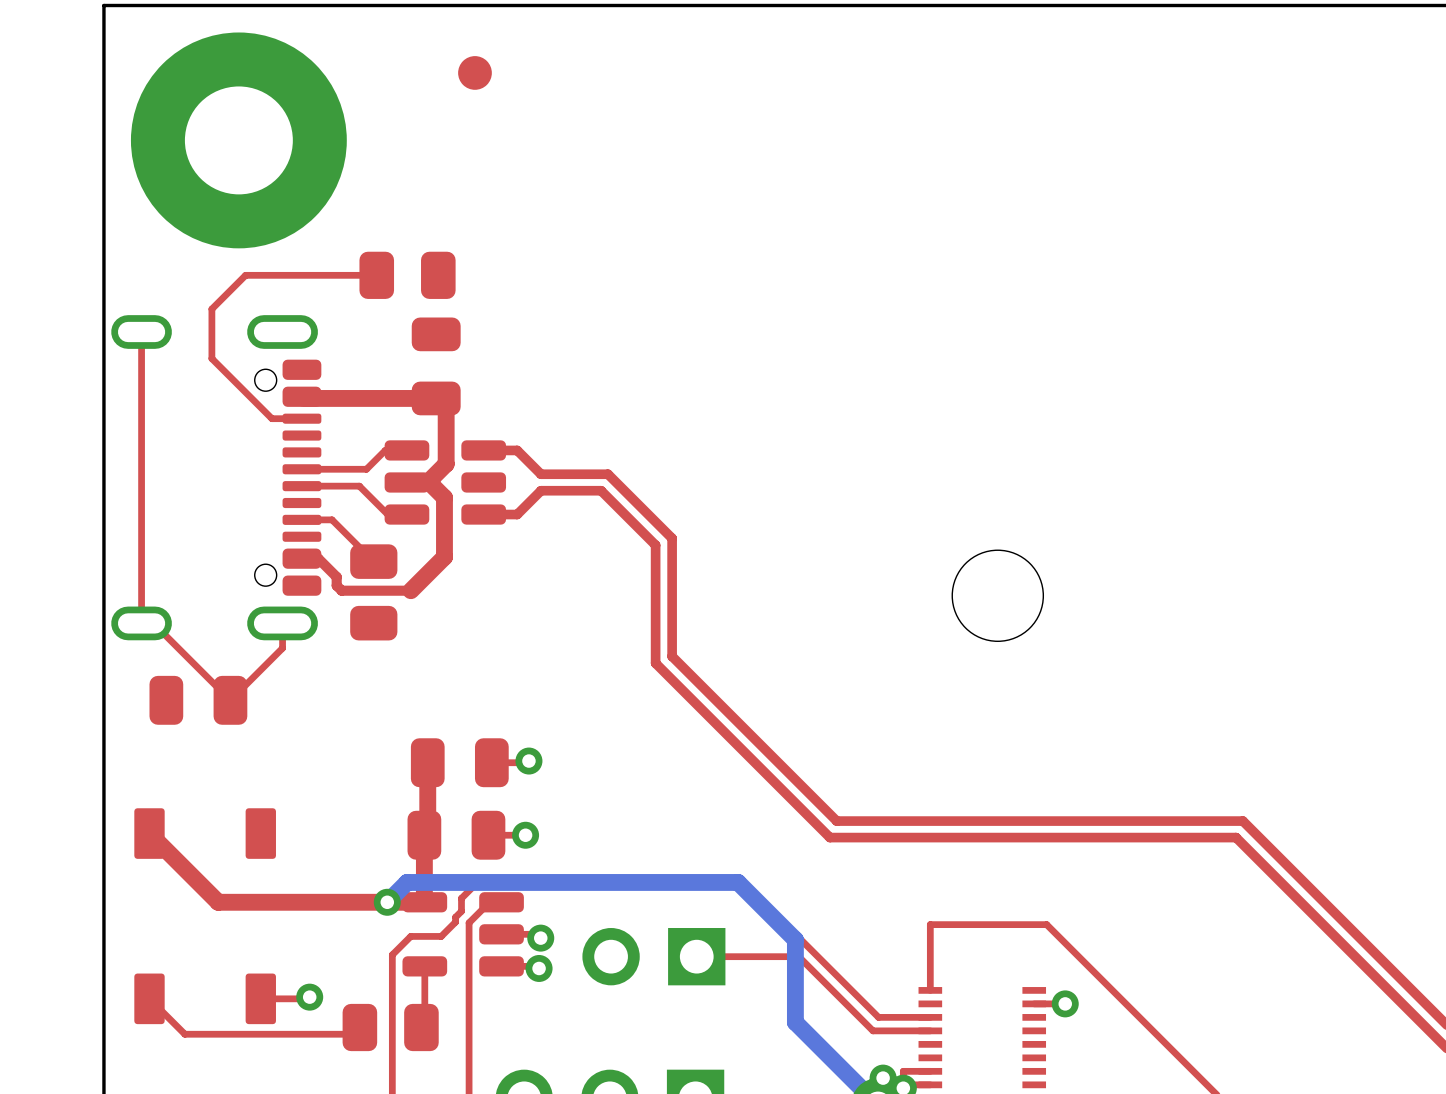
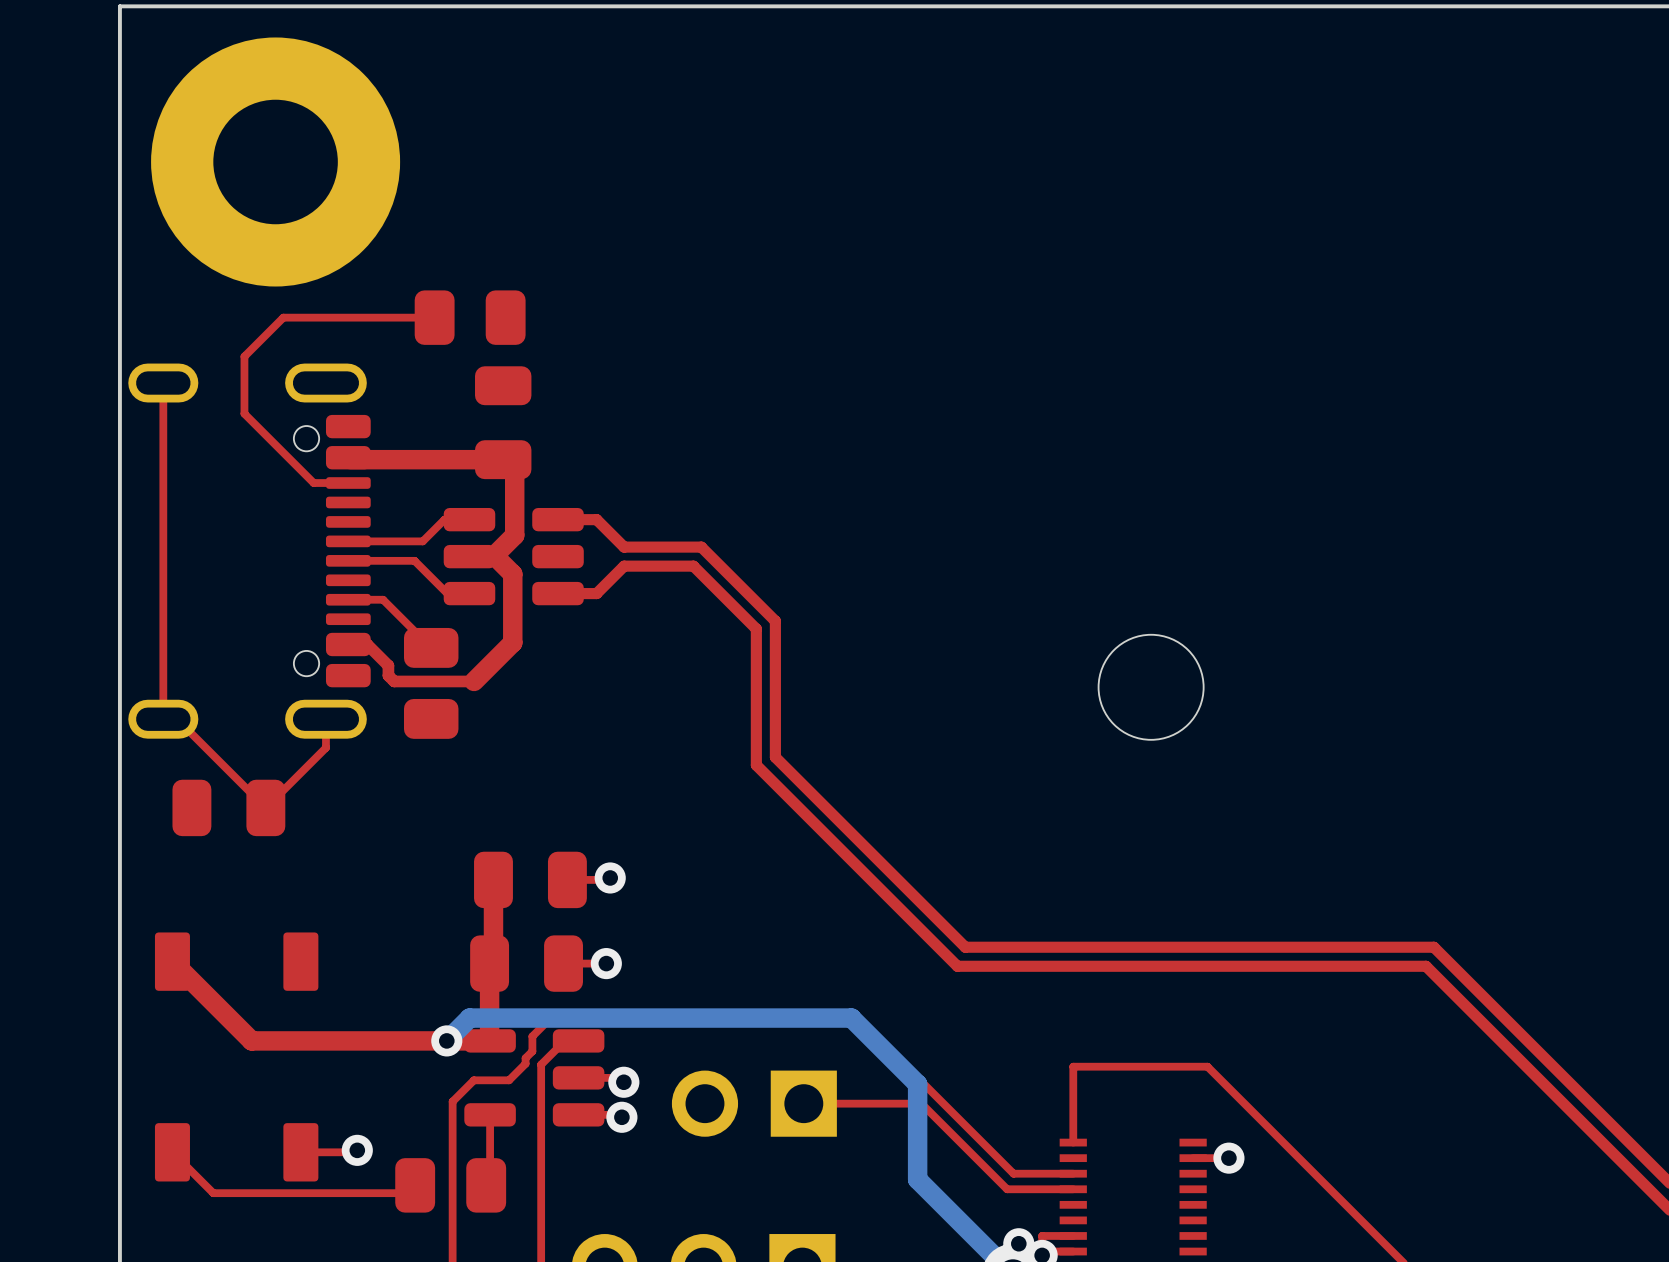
part: (474, 72) -> none

